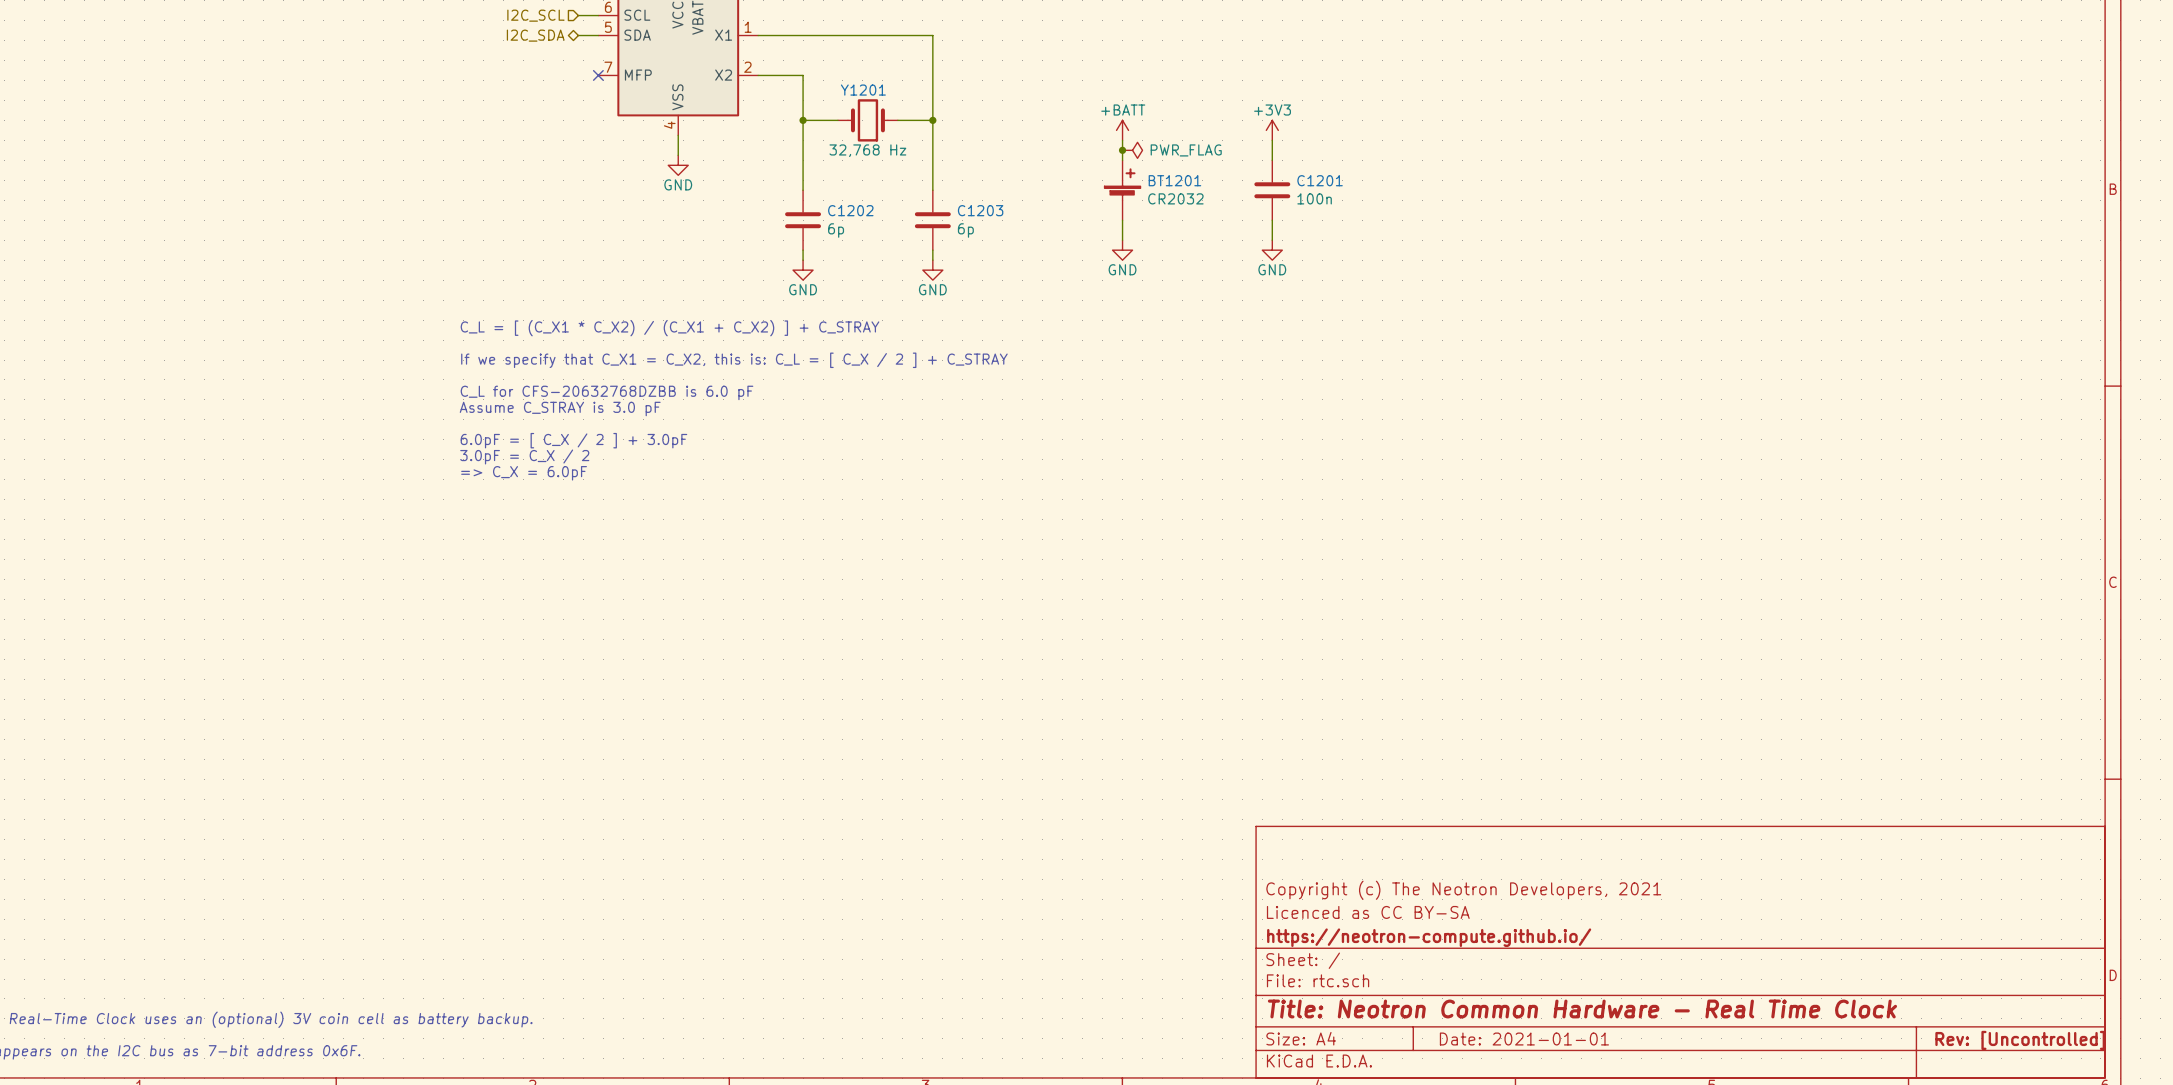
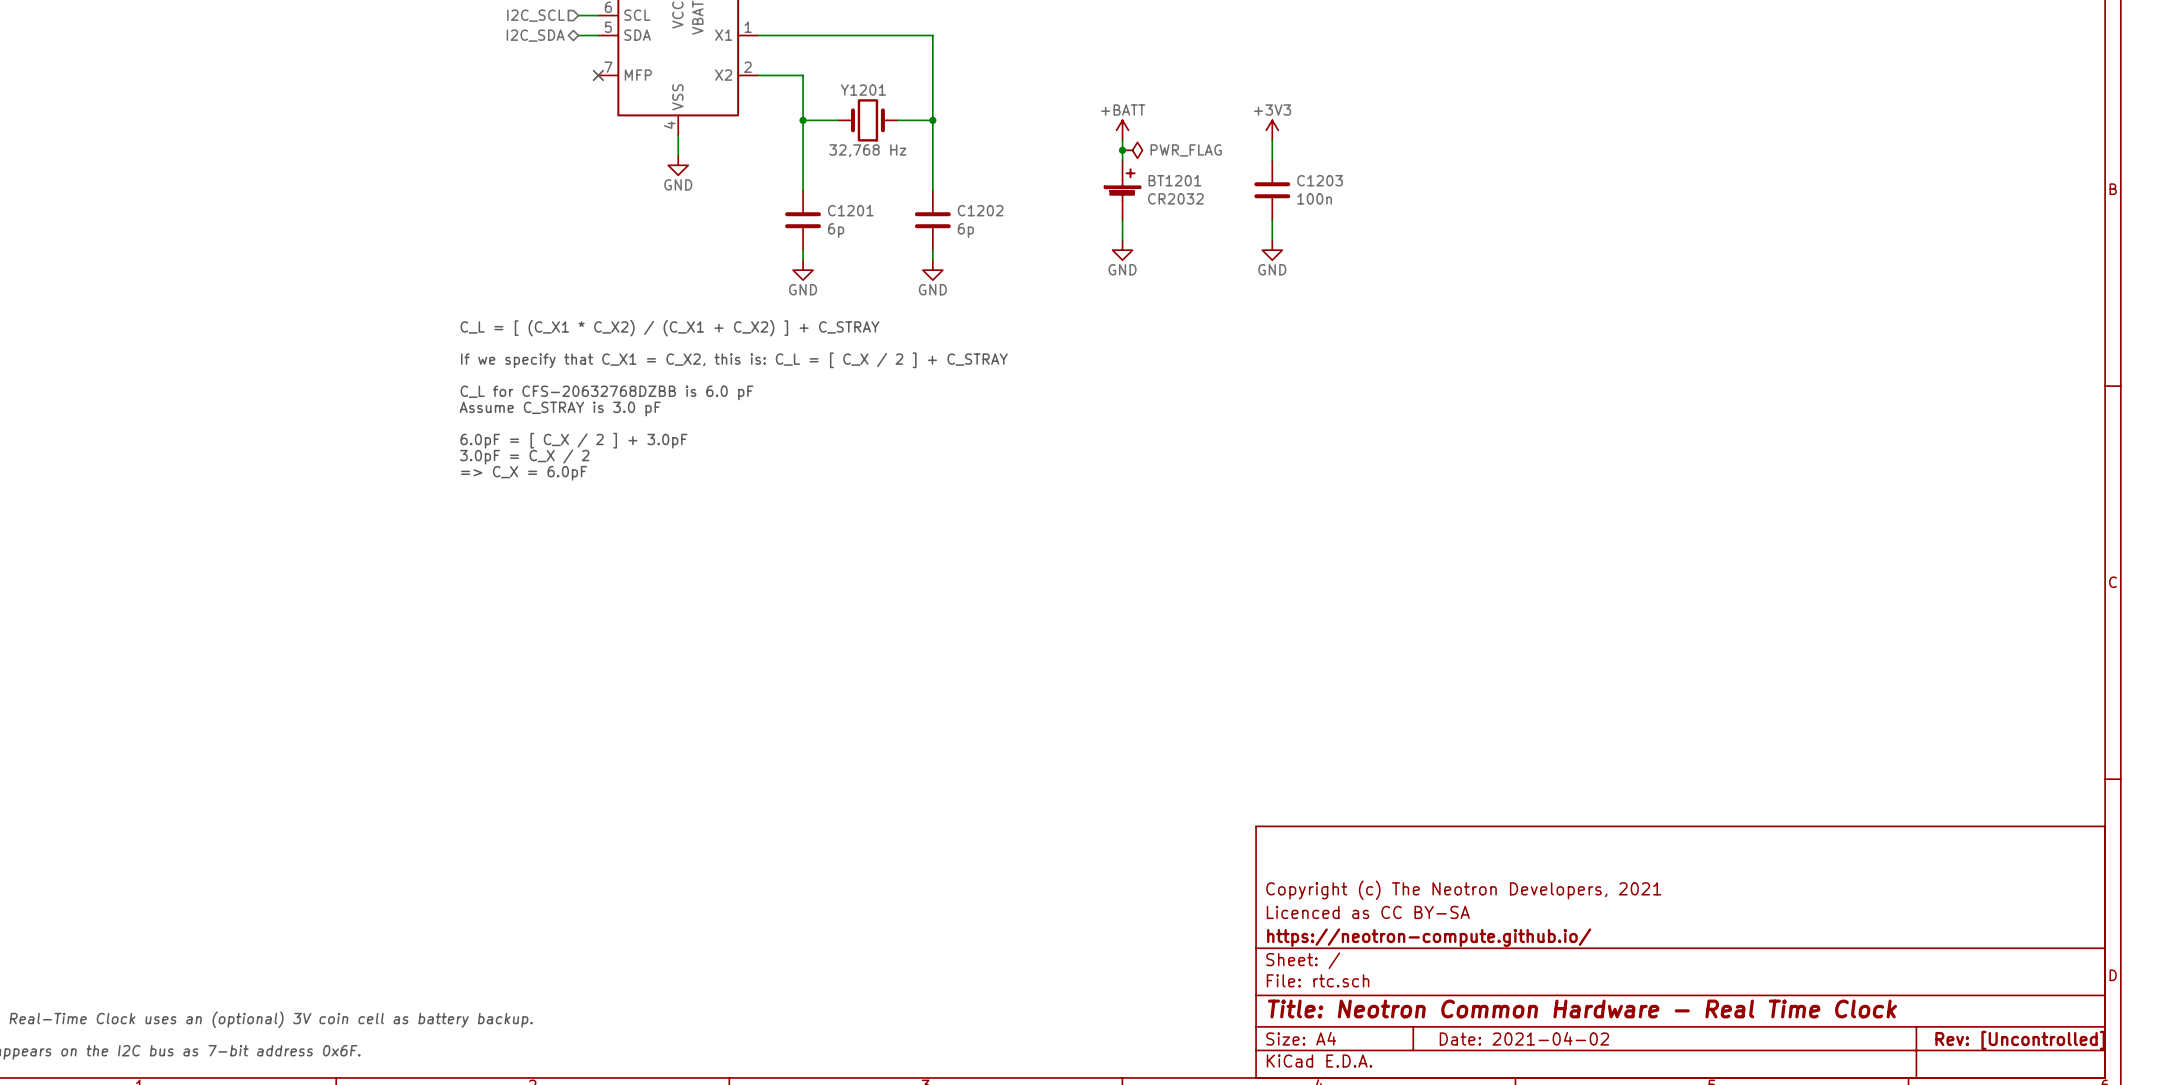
C1201 name: C1201 (1320, 180) -> C1203 (1320, 180)
C1202 name: C1202 (850, 210) -> C1201 (850, 210)
C1203 name: C1203 (980, 210) -> C1202 (980, 210)
title block: Date: 2021-01-01 (1524, 1039) -> Date: 2021-04-02 (1524, 1038)

